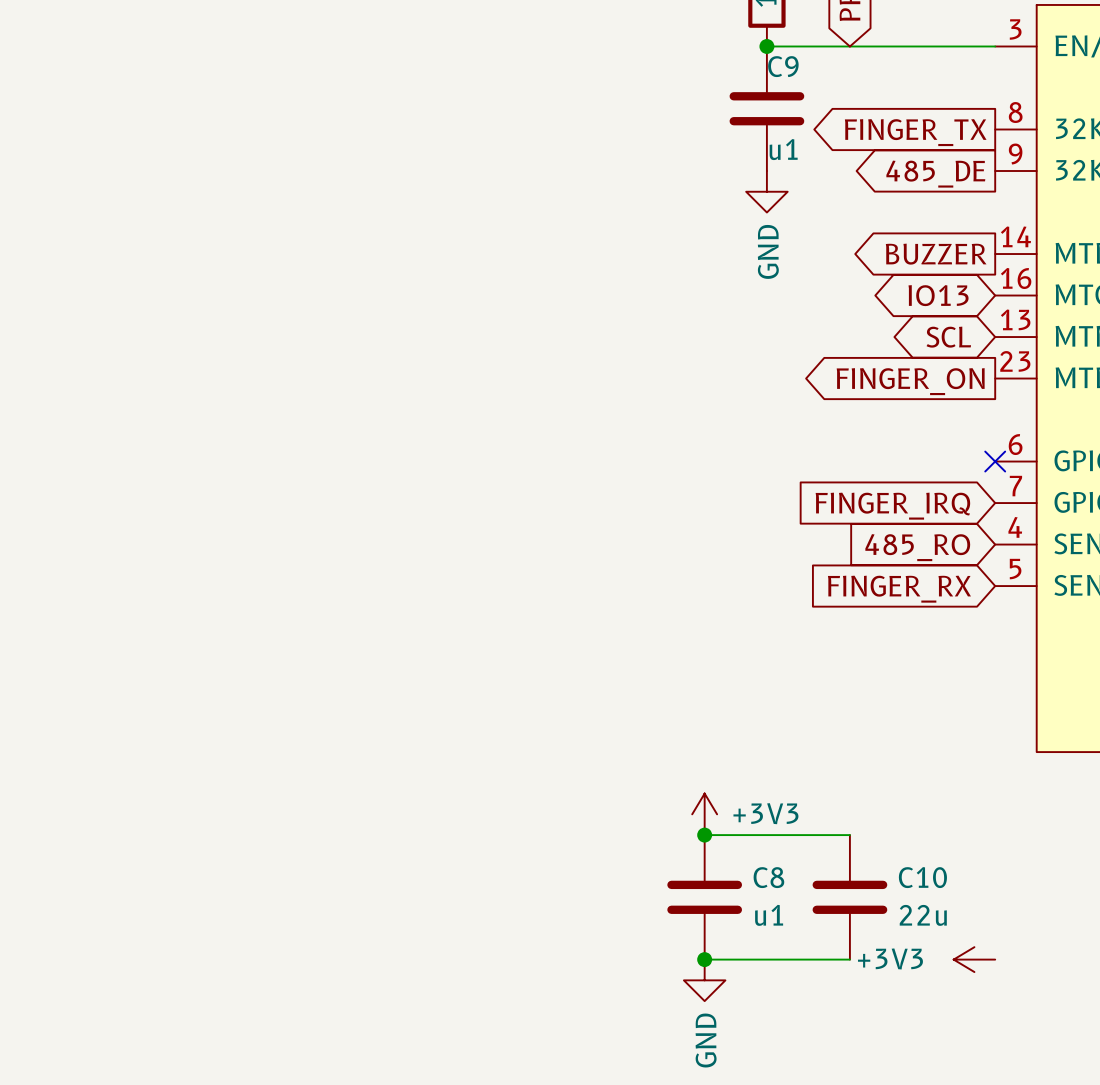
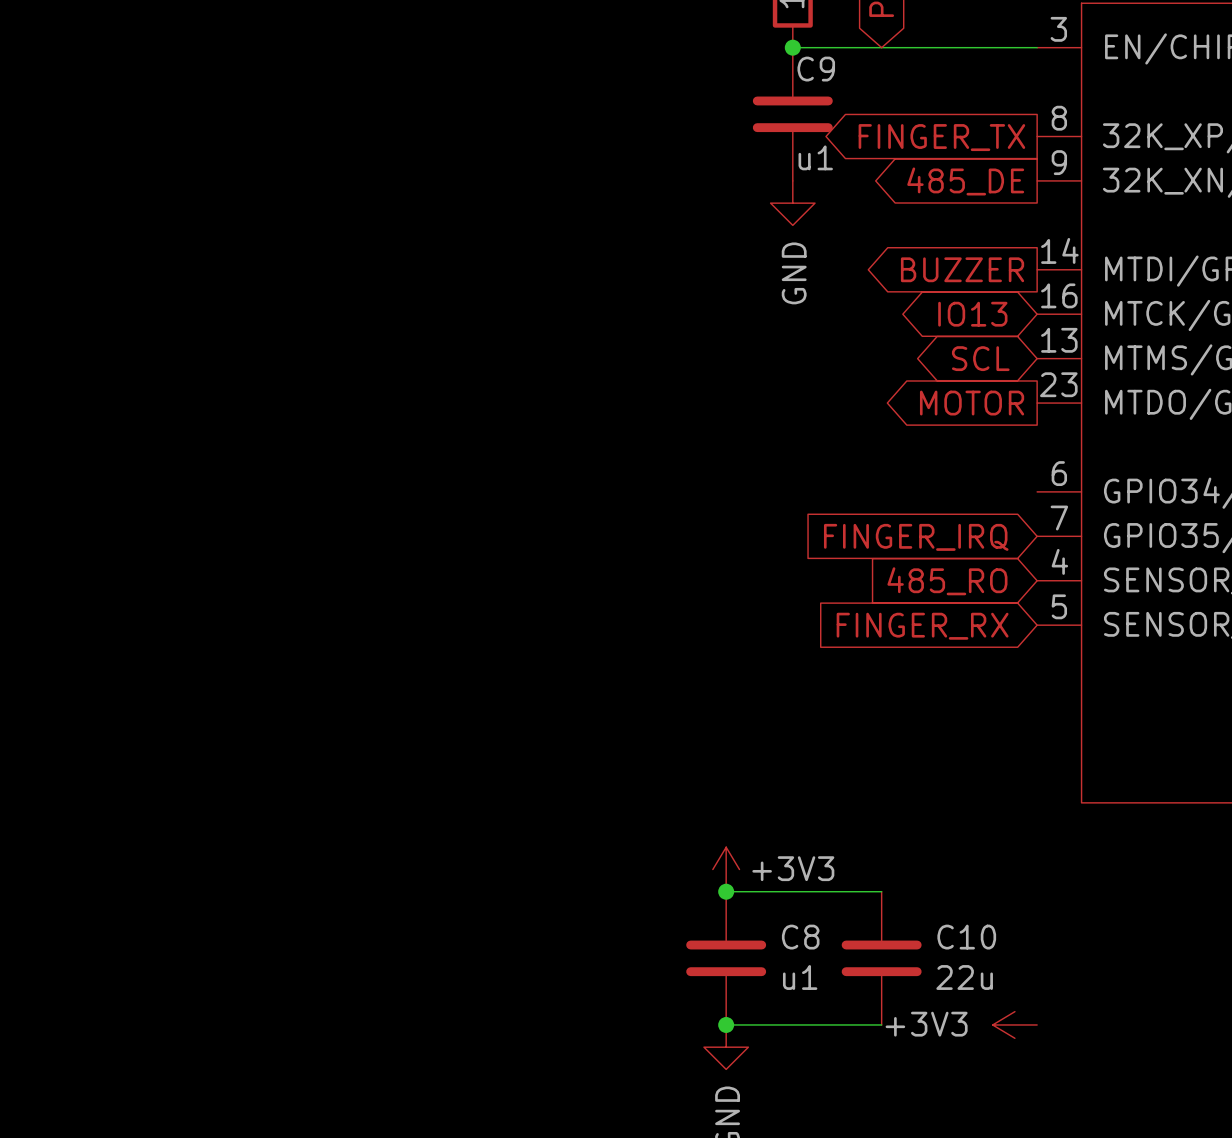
global label: FINGER_ON (910, 381) -> MOTOR (972, 403)
no-connect mark: (995, 461) -> none

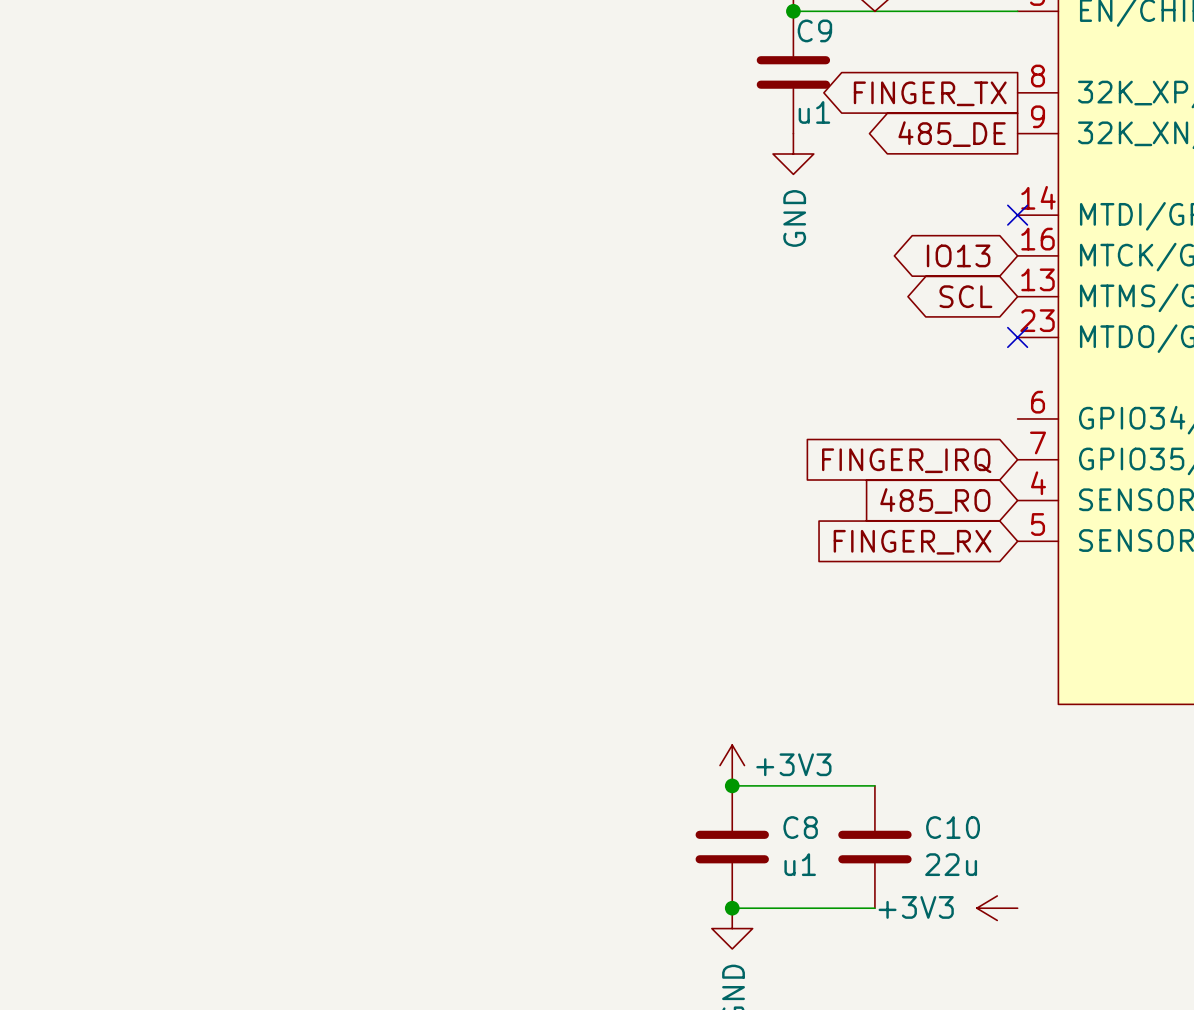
global label: BUZZER (962, 269) -> none
no-connect mark: none -> (1017, 215)
global label: MOTOR (972, 403) -> none
no-connect mark: none -> (1017, 337)

